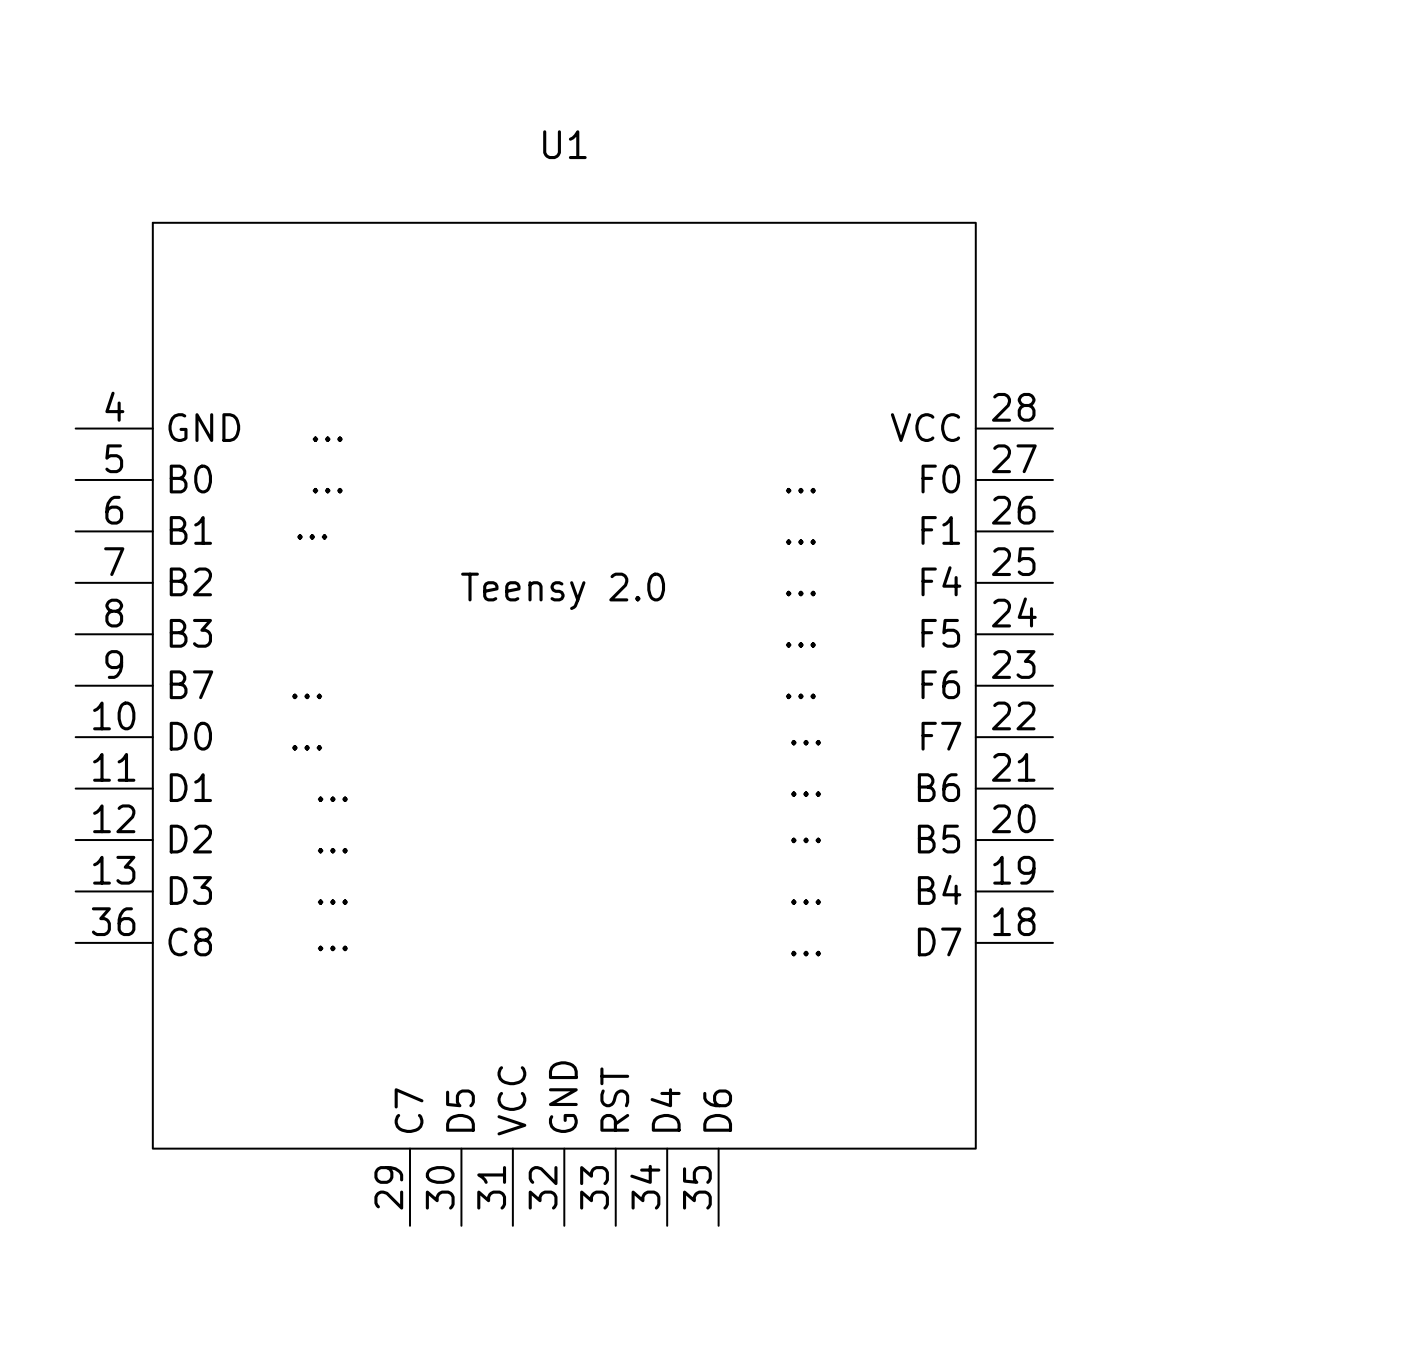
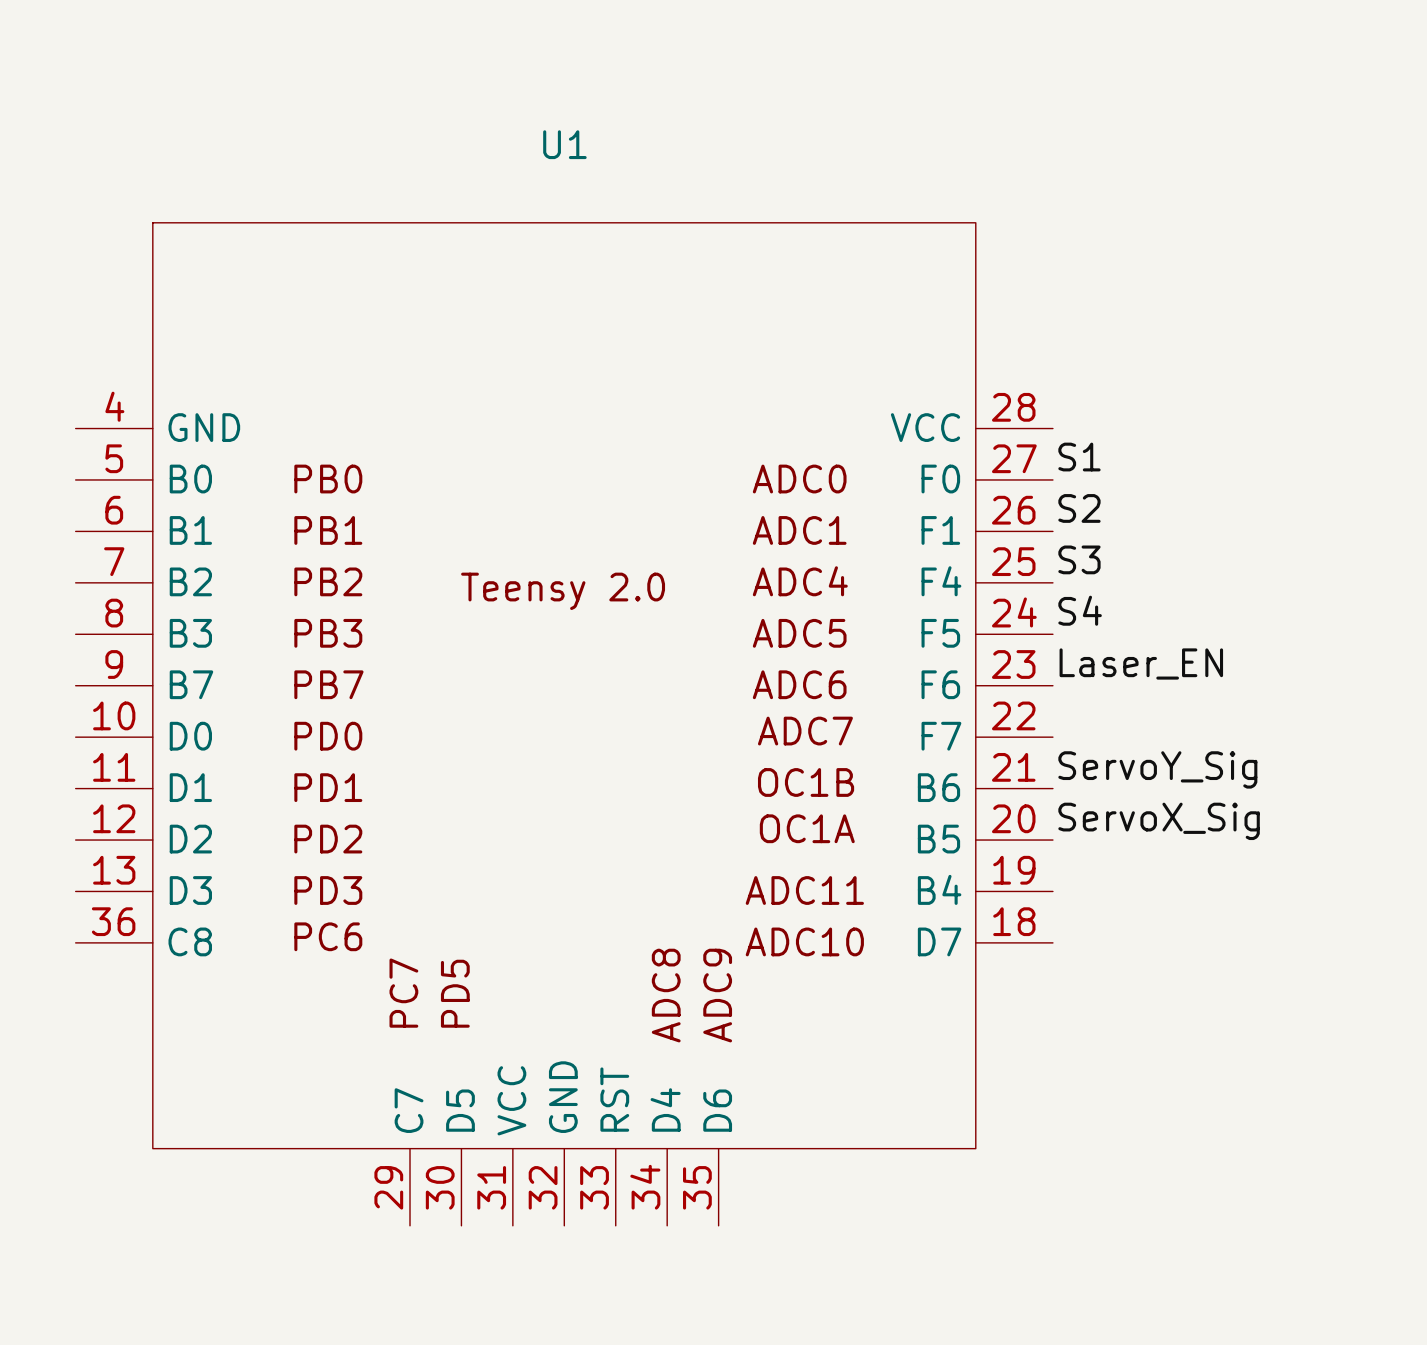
U1 symbol: [75, 222, 1053, 1226] -> [75, 222, 1053, 1226]
label: none -> S1 (1079, 457)
label: none -> S2 (1079, 508)
label: none -> S3 (1079, 559)
label: none -> S4 (1080, 610)
label: none -> Laser_EN (1141, 663)
label: none -> ServoY_Sig (1157, 769)
label: none -> ServoX_Sig (1159, 821)

